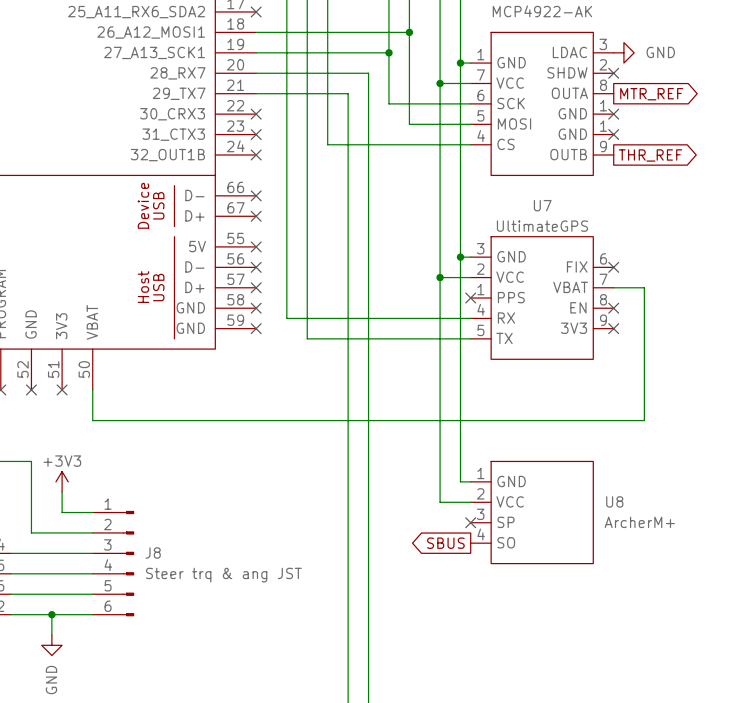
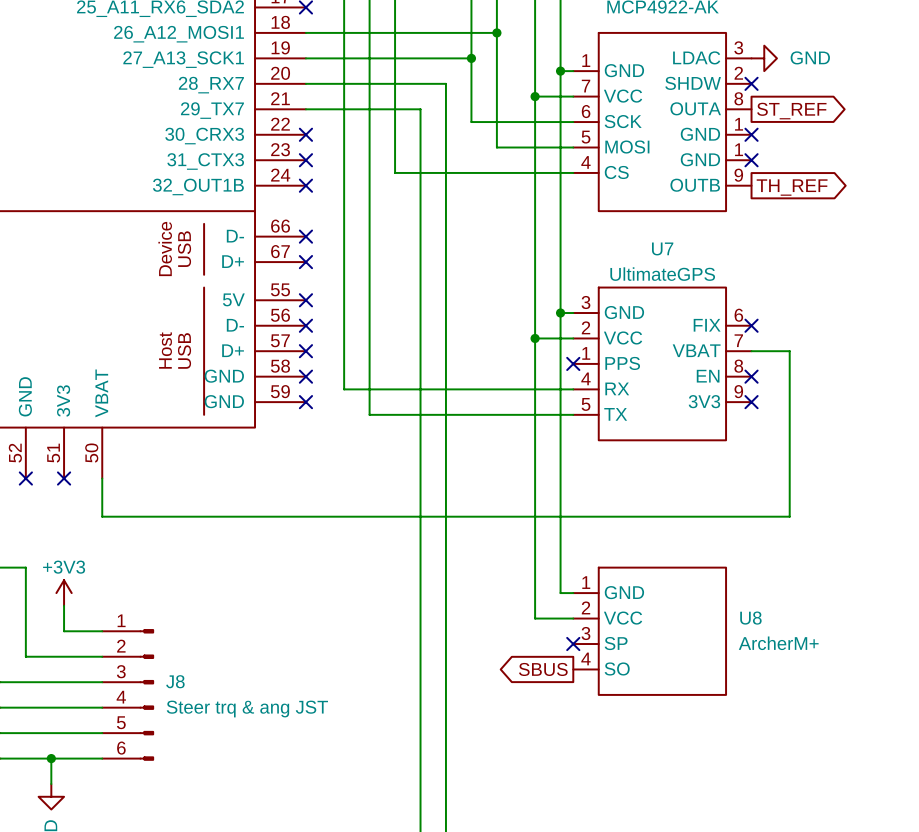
global label: MTR_REF (651, 94) -> ST_REF (791, 111)
global label: THR_REF (650, 155) -> TH_REF (792, 187)

